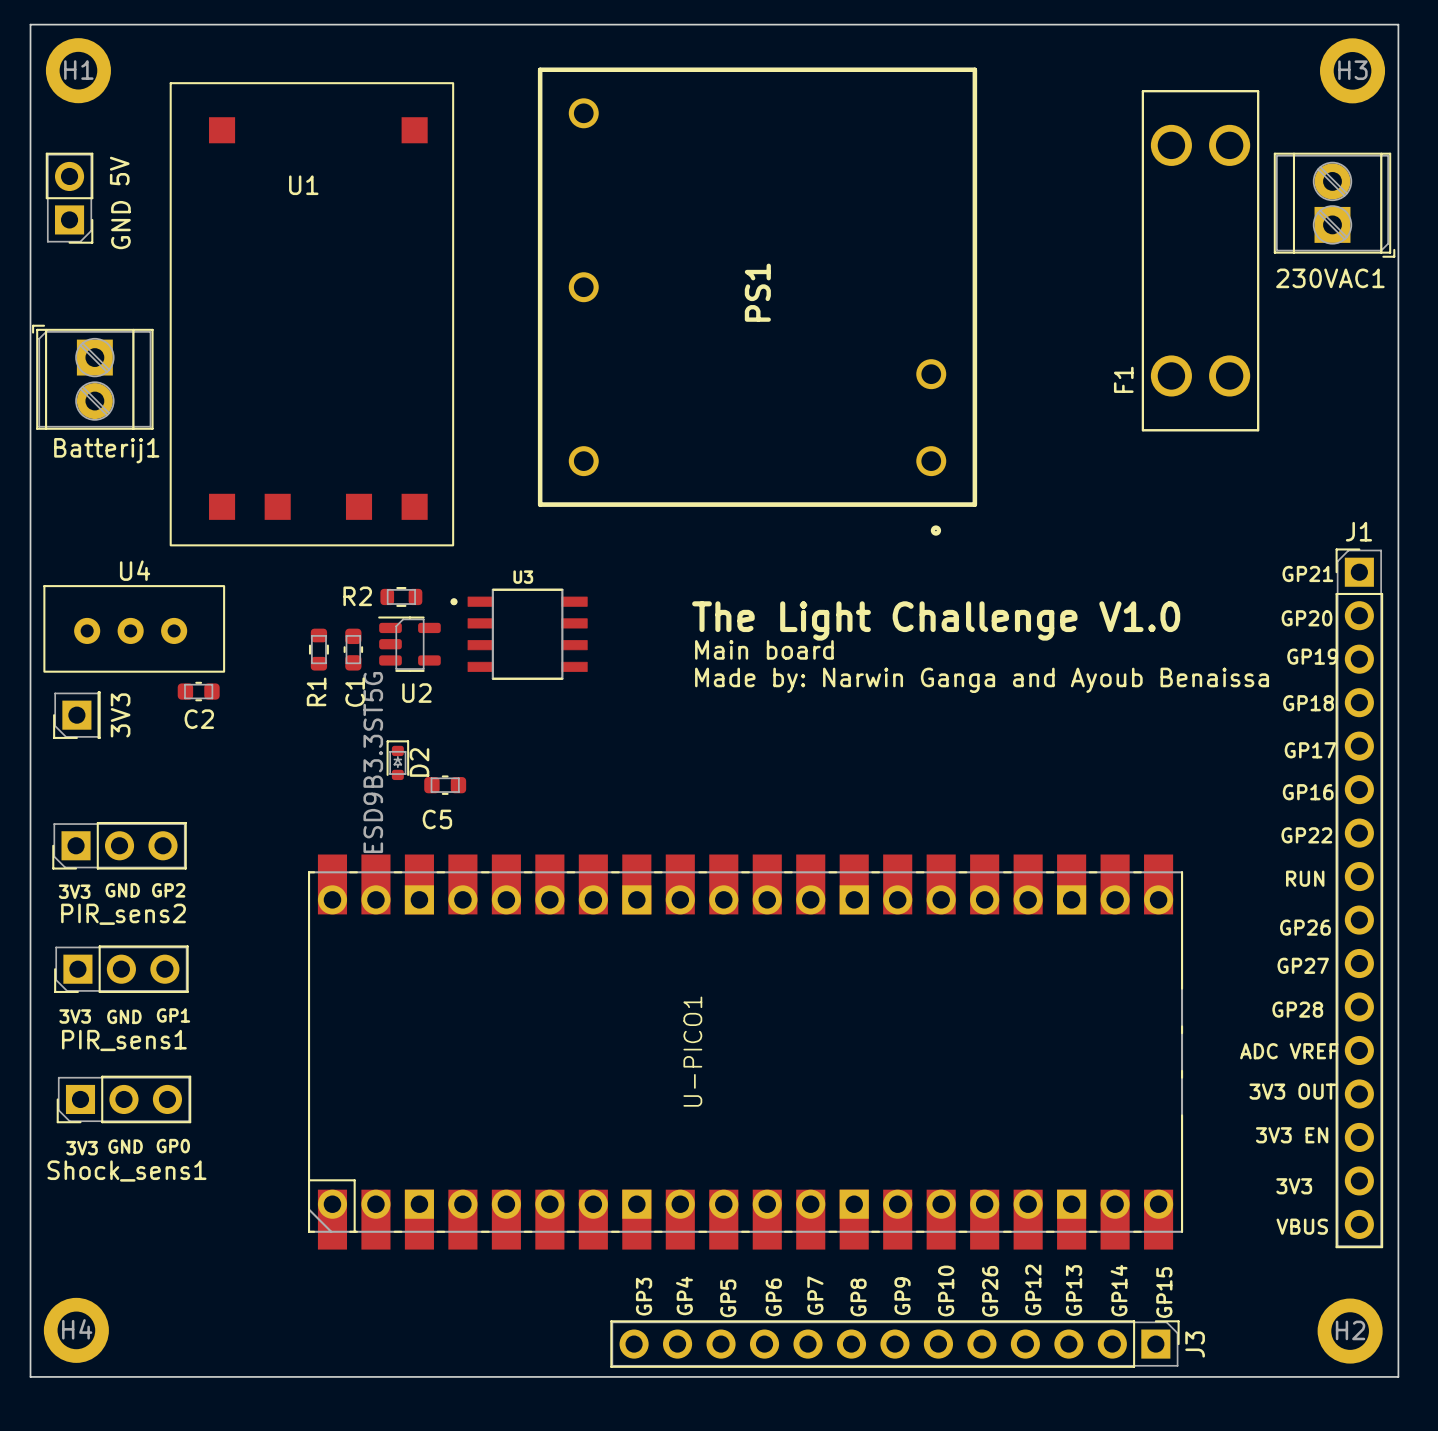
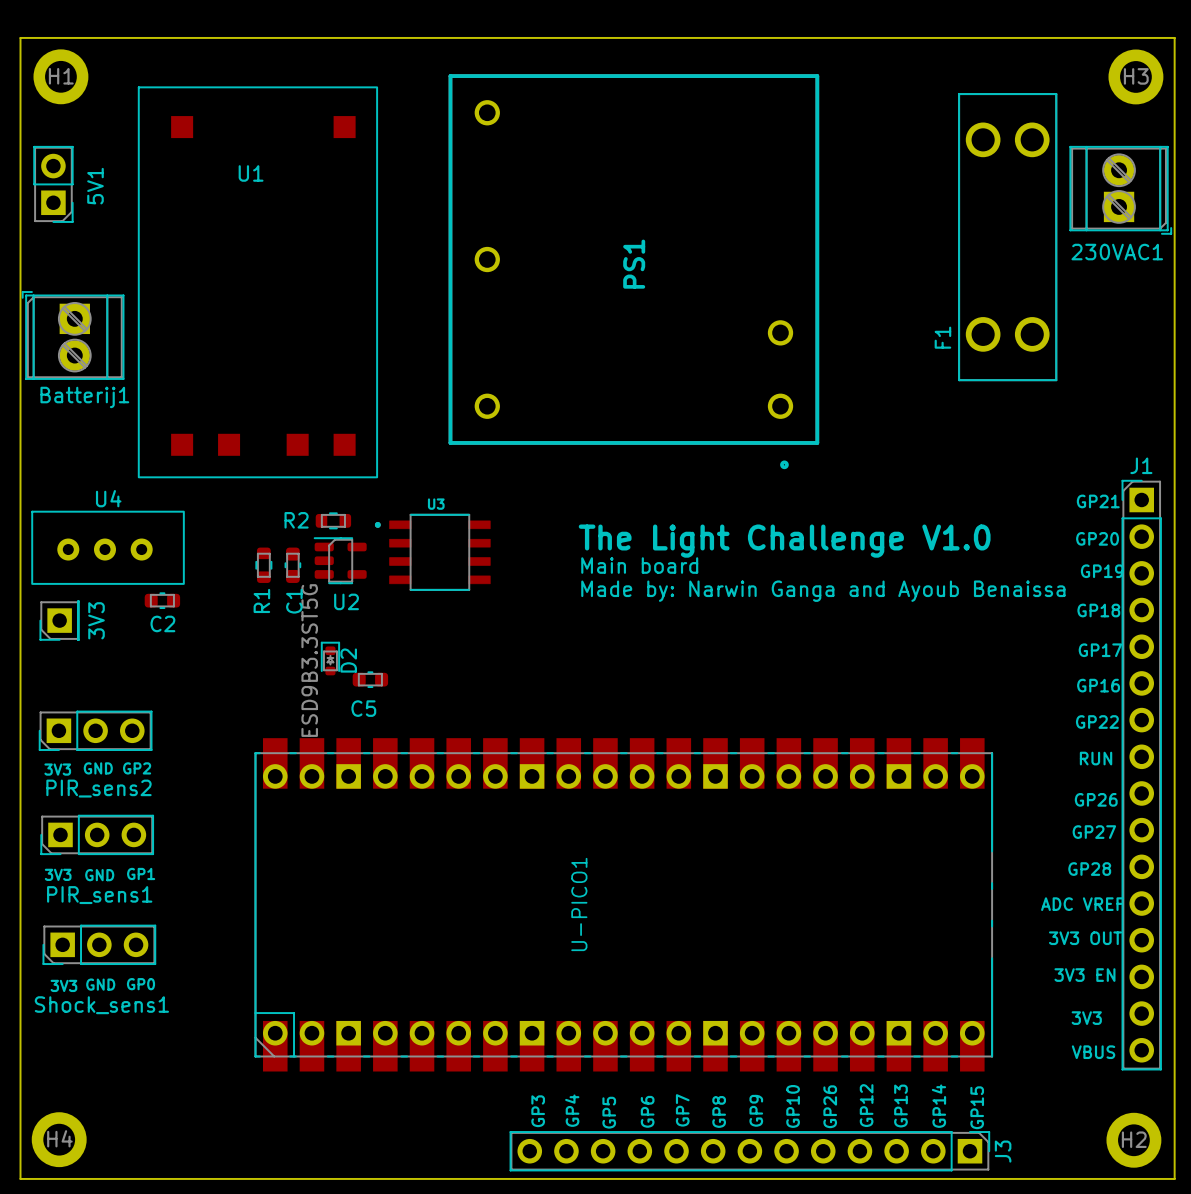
5V name: 5V (119, 171) -> 5V1 (95, 186)
text: GND (120, 225) -> none

